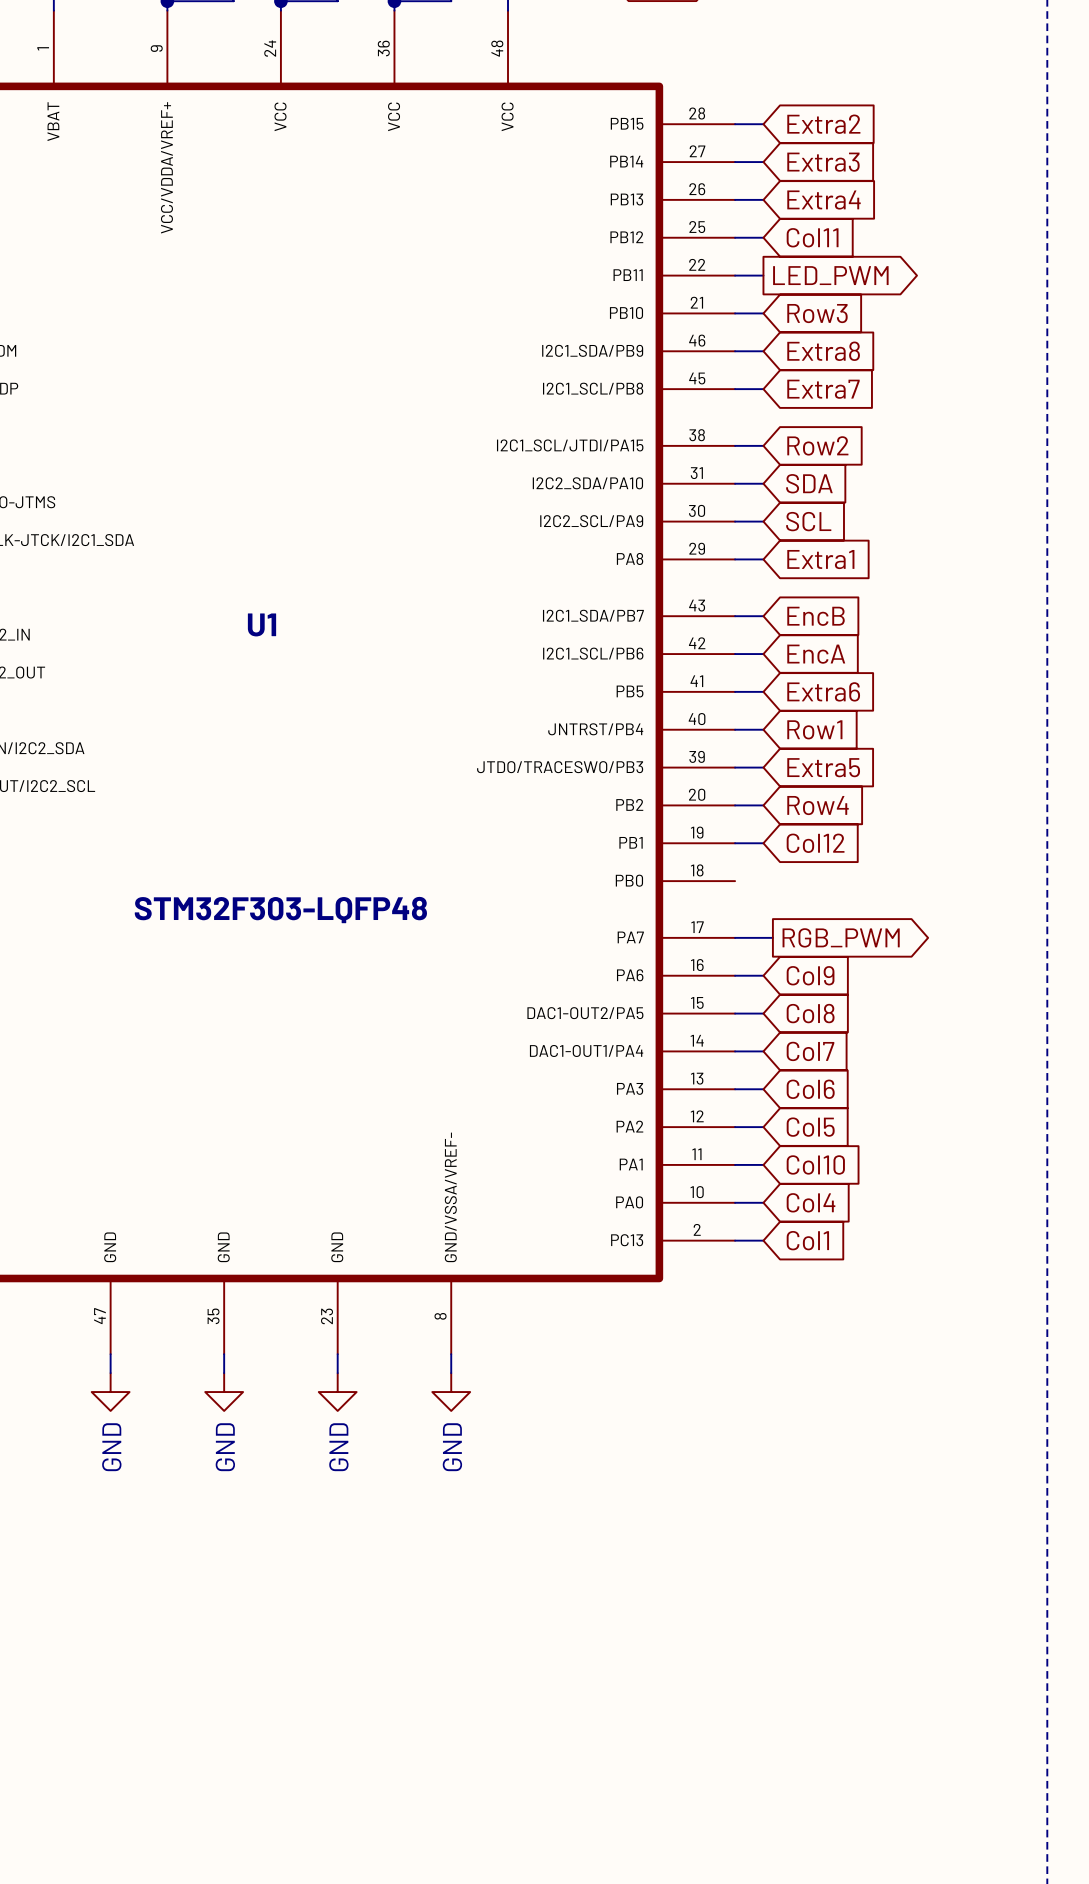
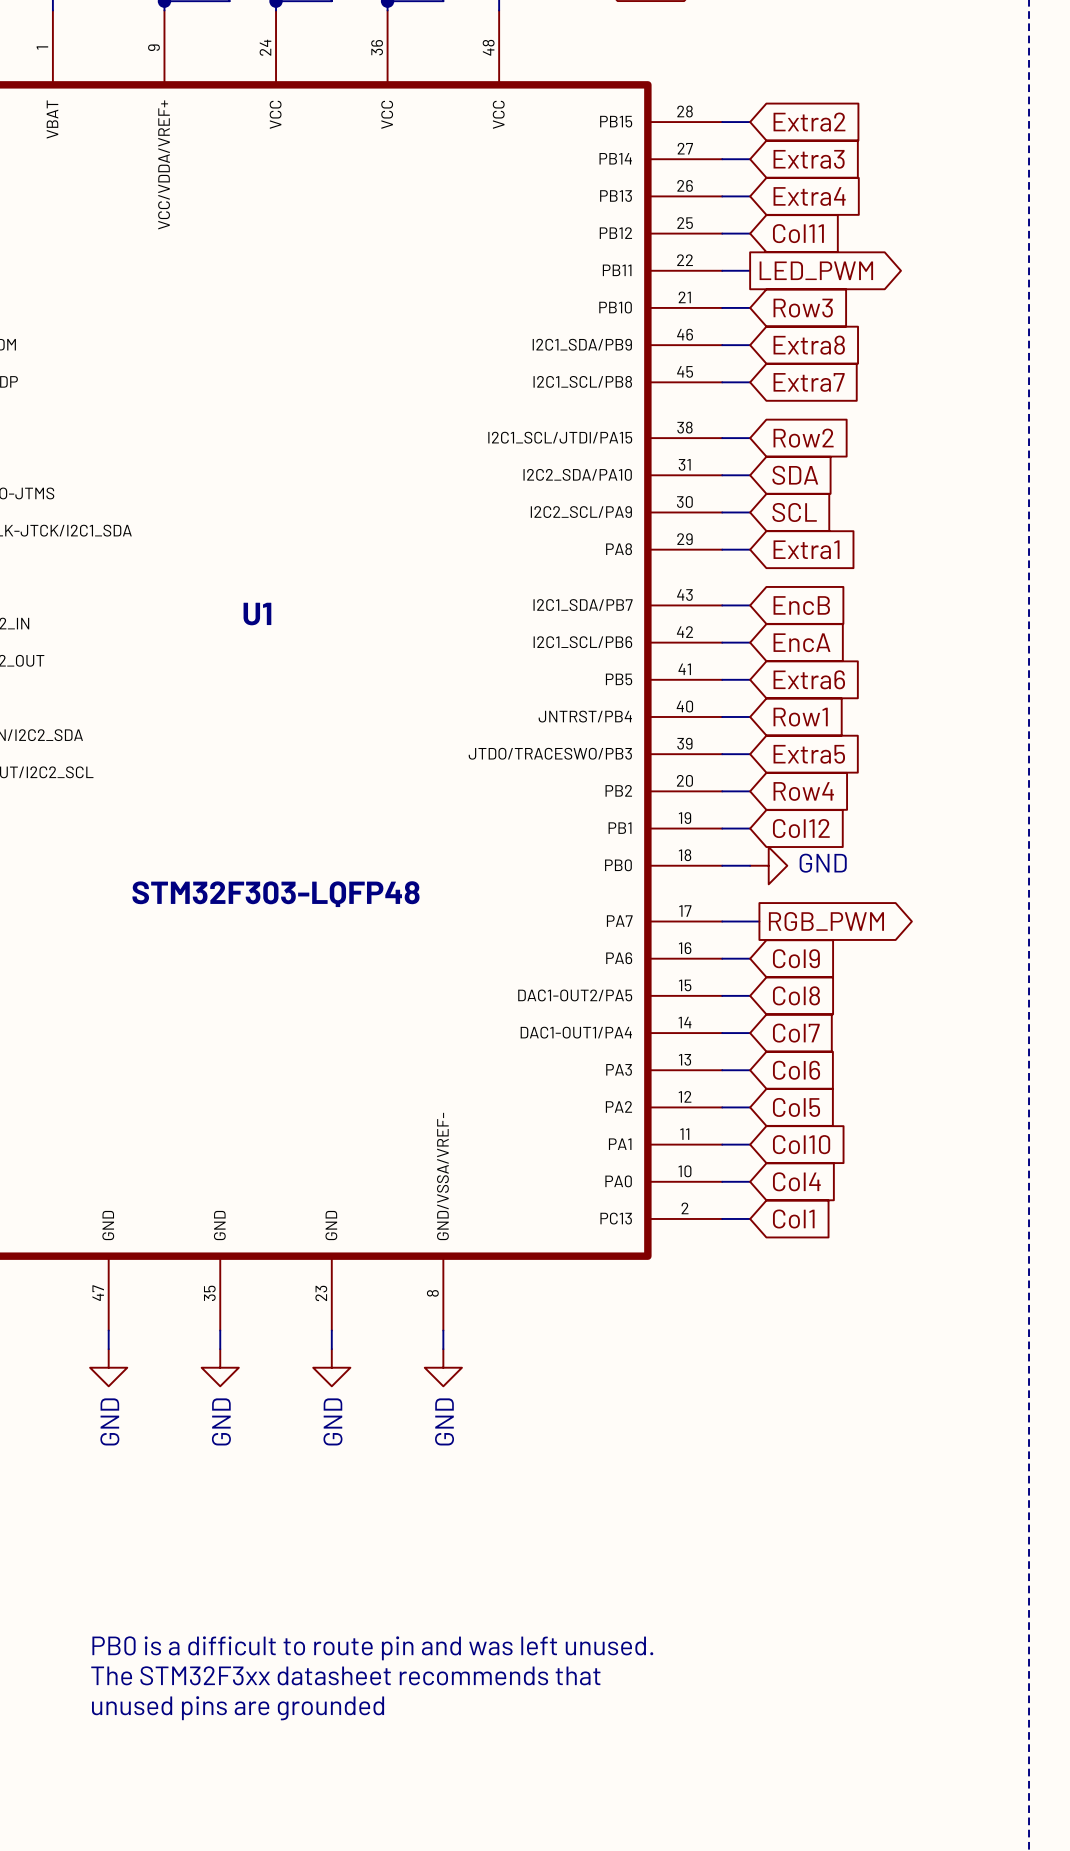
wire: none -> (722, 865) (750, 865)
power symbol: none -> GND (768, 865)
text: none -> PB0 is a difficult to route pin and was left unused. (372, 1648)
text: none -> The STM32F3xx datasheet recommends that (345, 1675)
text: none -> unused pins are grounded (238, 1708)

